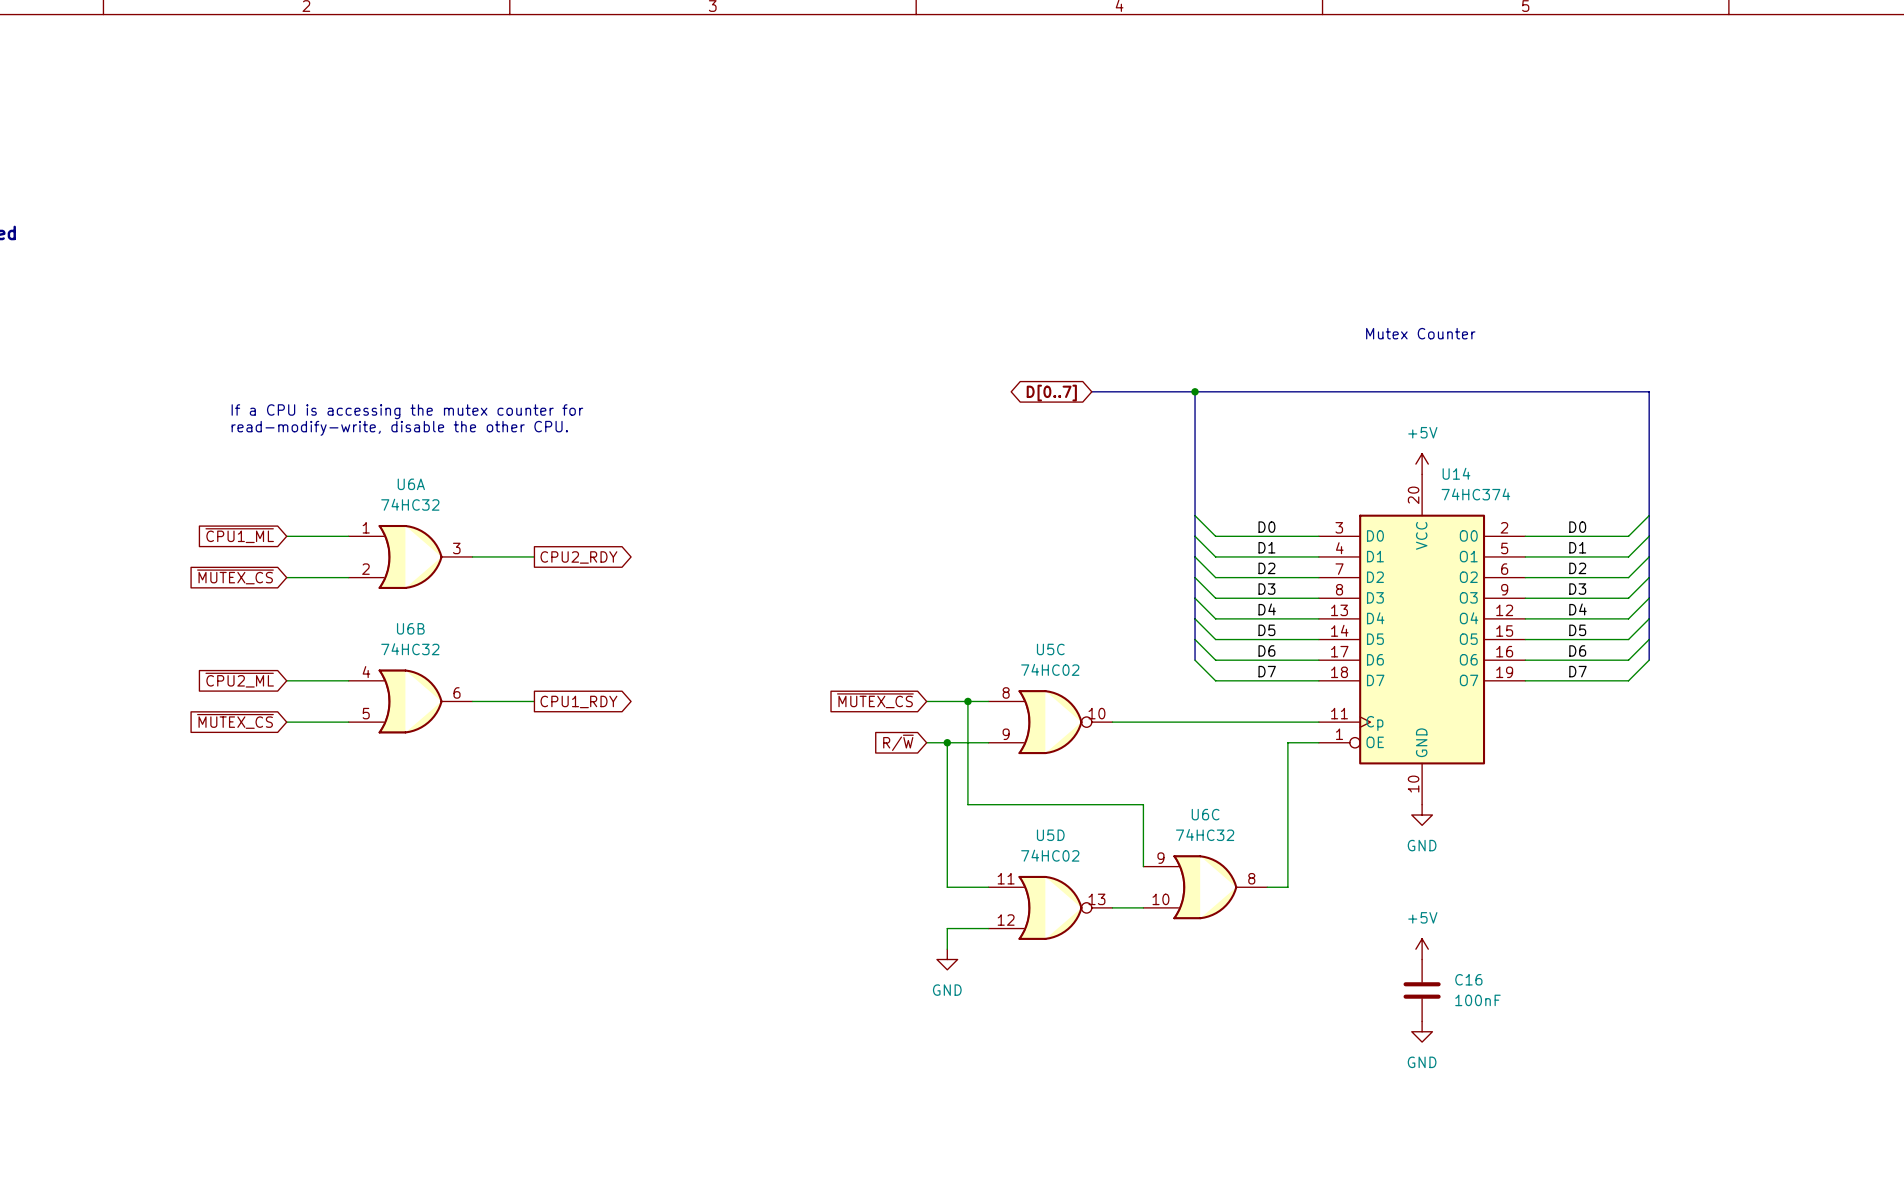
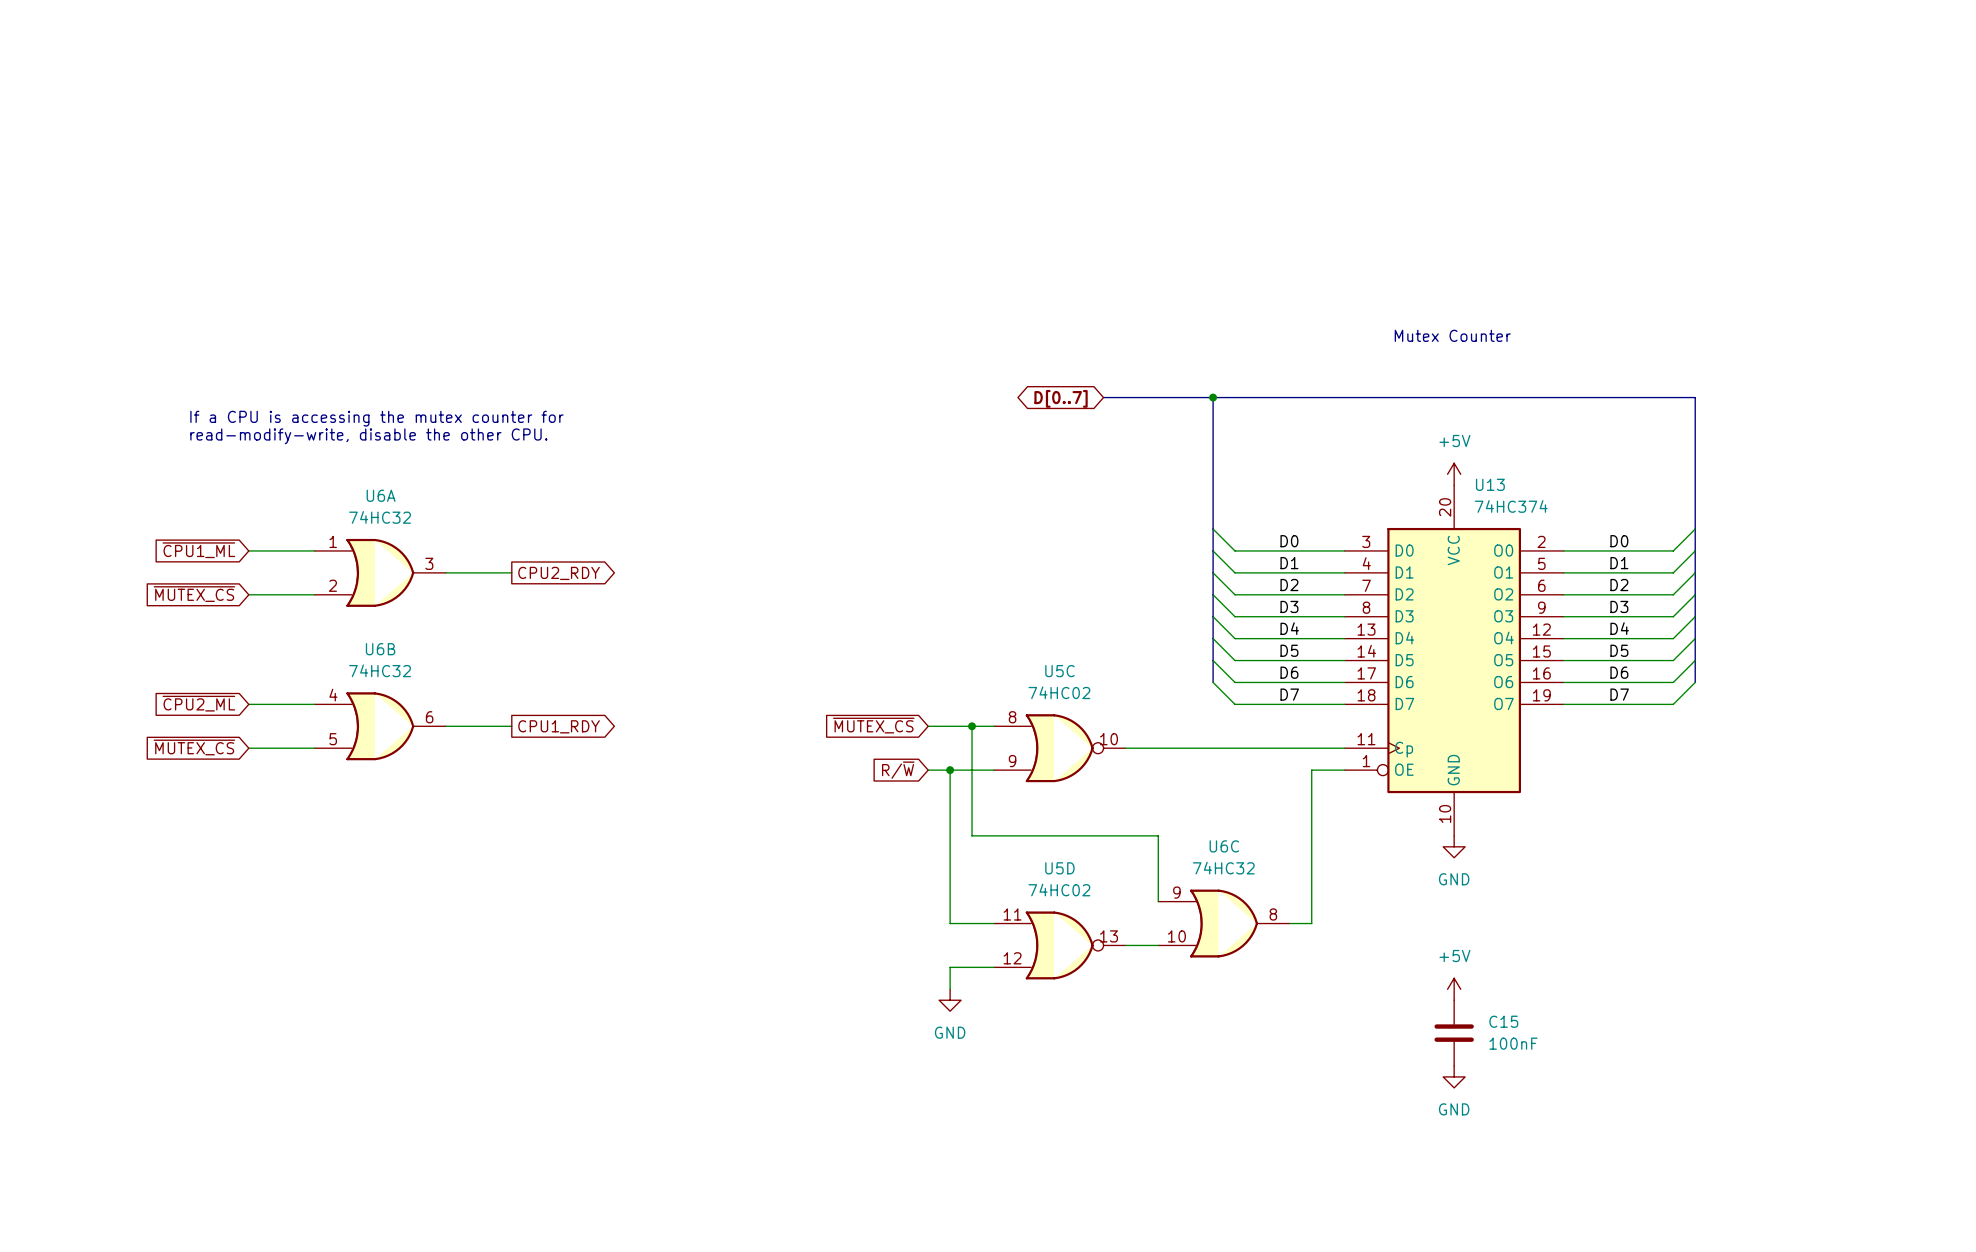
U14 name: U14 (1456, 473) -> U13 (1490, 484)
C16 name: C16 (1468, 979) -> C15 (1503, 1021)

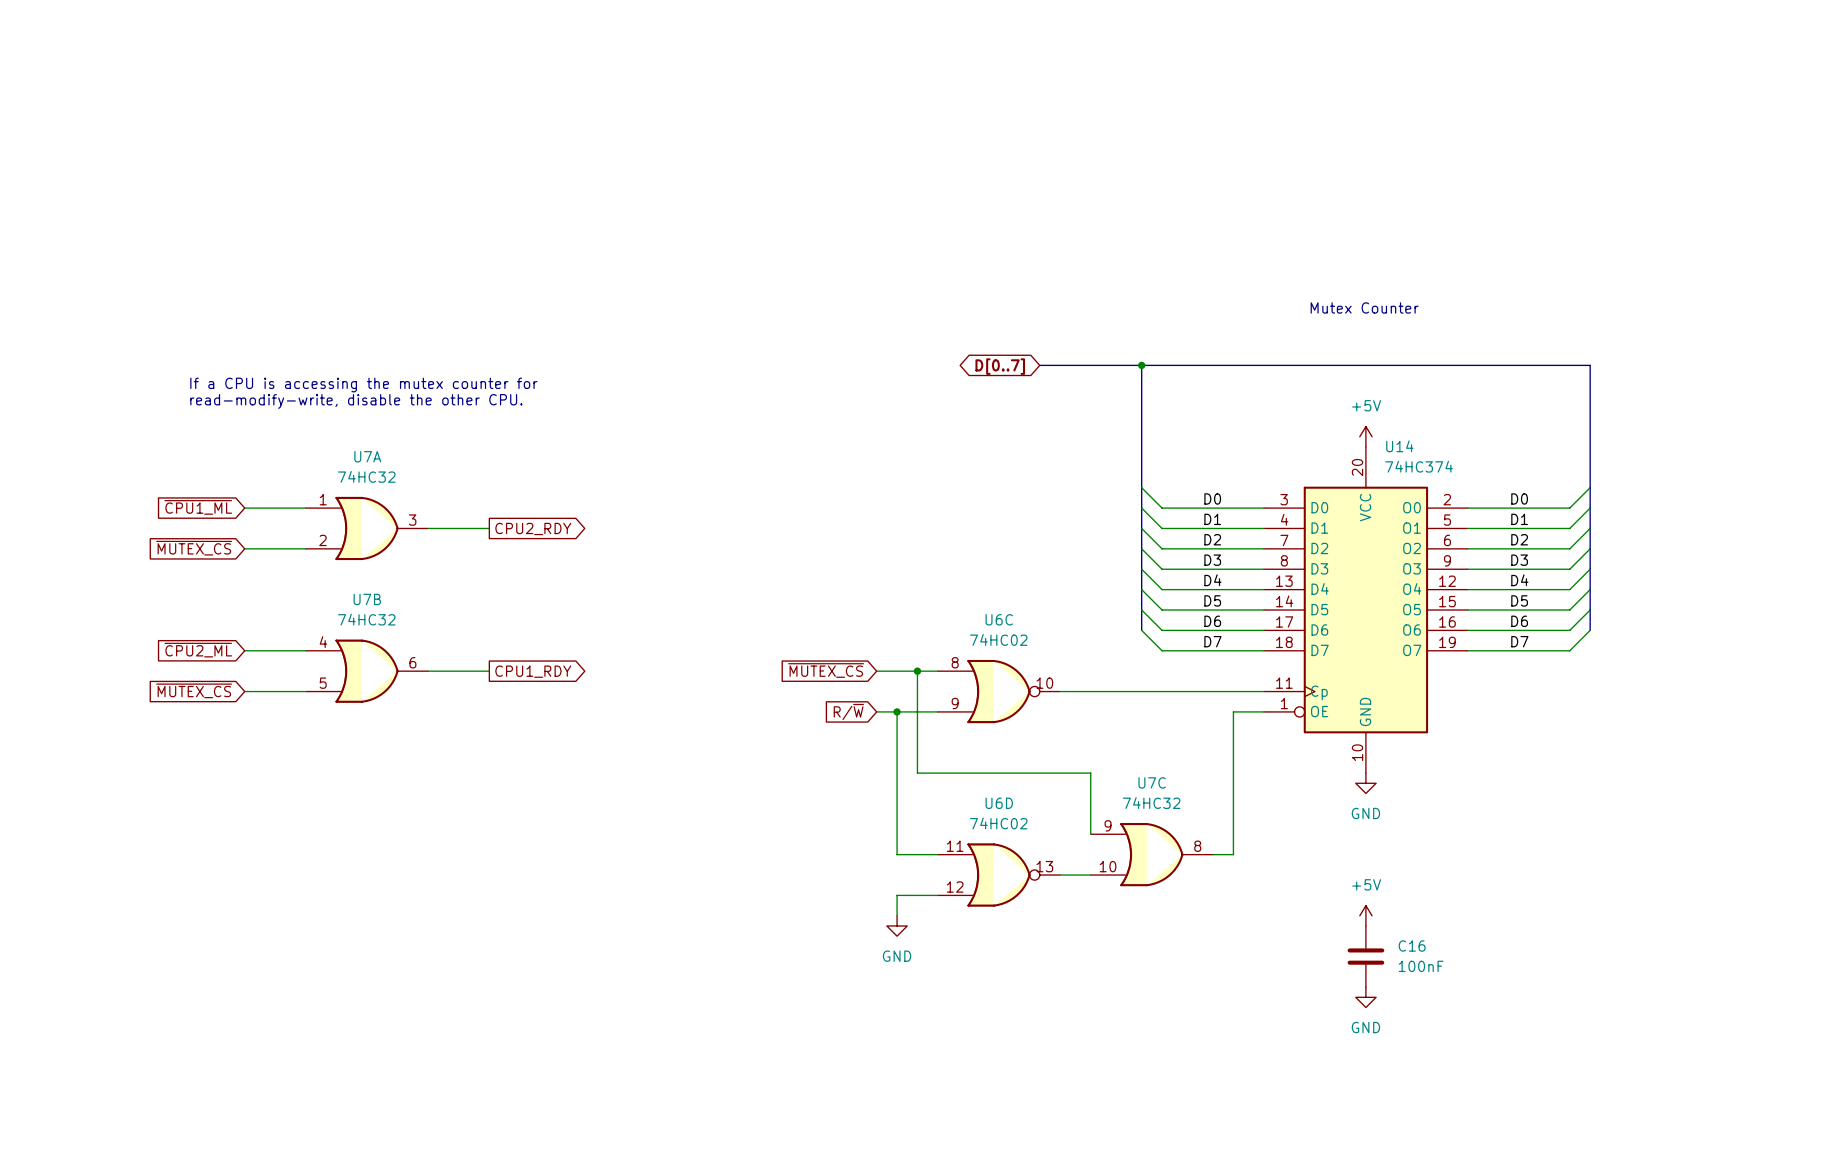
U13 name: U13 (1490, 484) -> U14 (1399, 446)
U6A name: U6A (381, 495) -> U7A (367, 456)
U6B name: U6B (380, 649) -> U7B (367, 599)
U5C name: U5C (1059, 671) -> U6C (999, 619)
U6C name: U6C (1224, 846) -> U7C (1152, 782)
U5D name: U5D (1059, 868) -> U6D (999, 803)
C15 name: C15 (1503, 1021) -> C16 (1412, 945)

